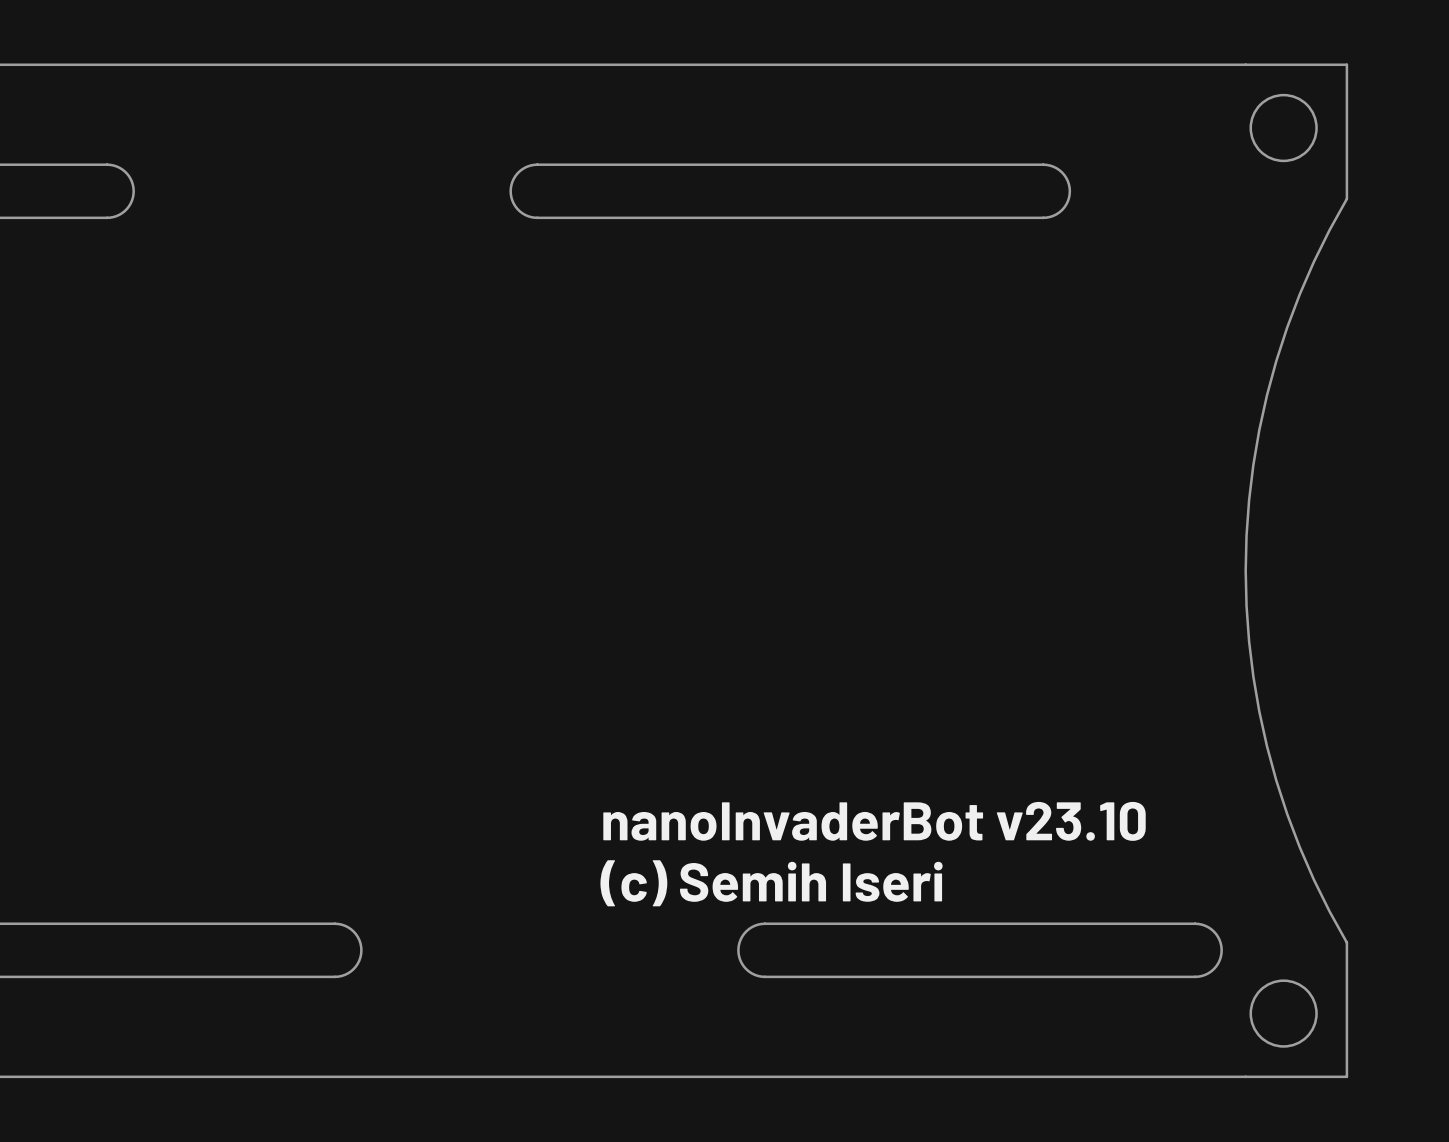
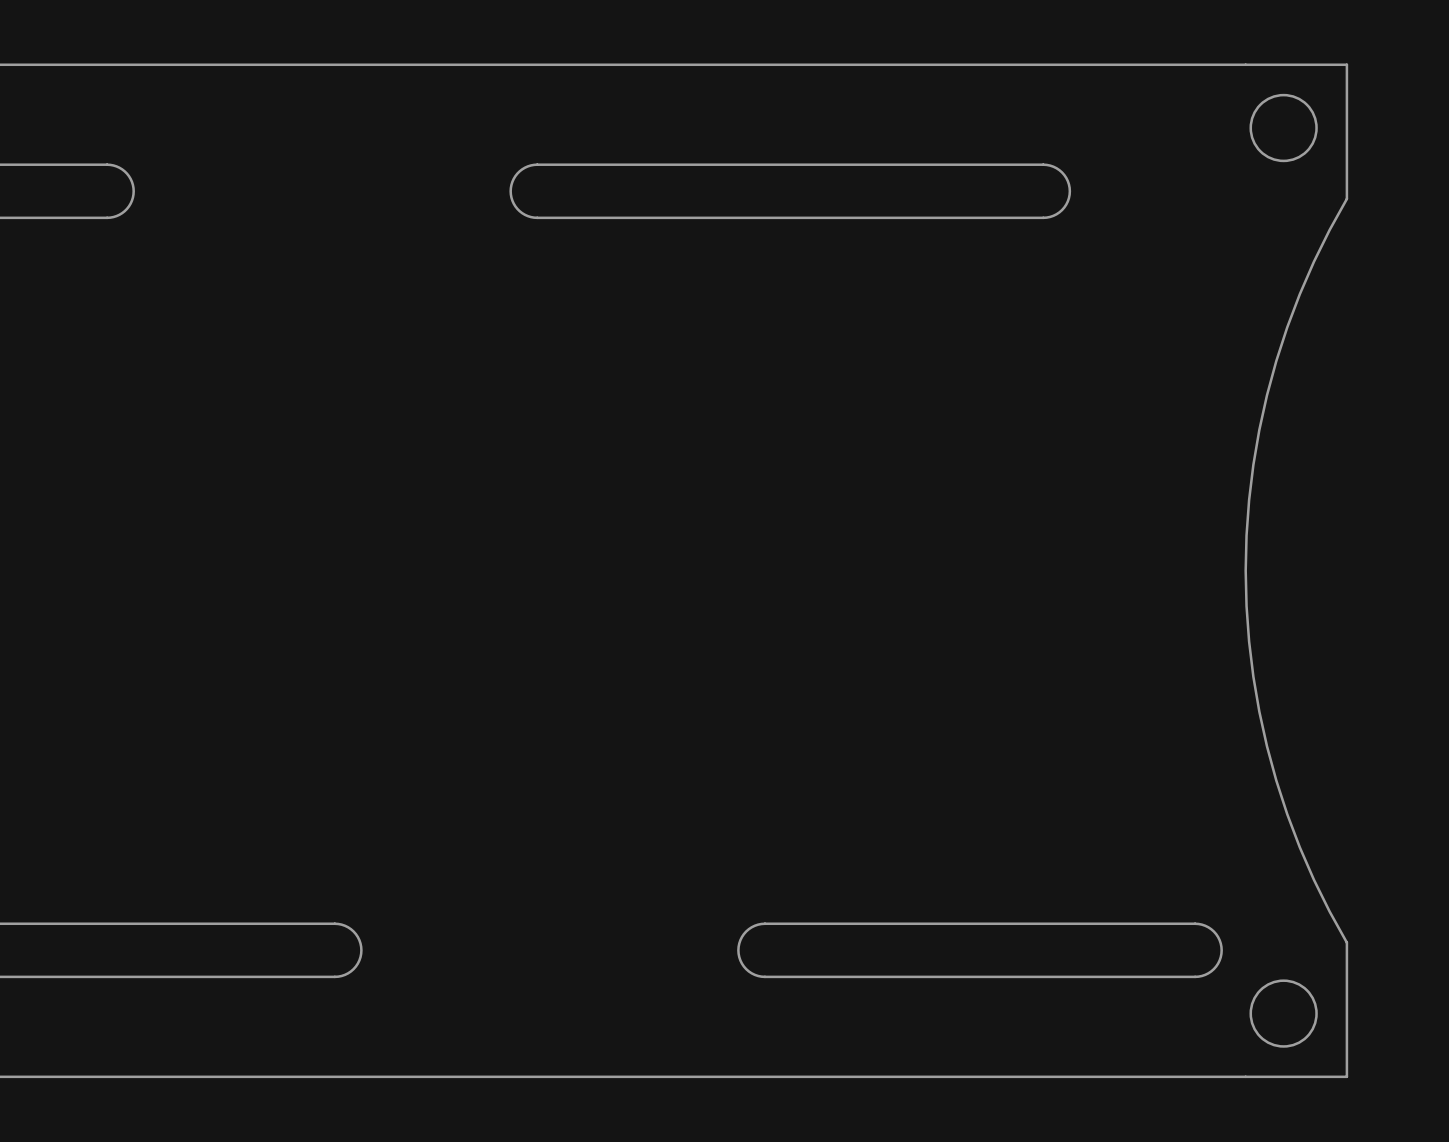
text: nanoInvaderBot v23.10 (874, 821) -> none
text: (c) Semih Iseri (771, 883) -> none

